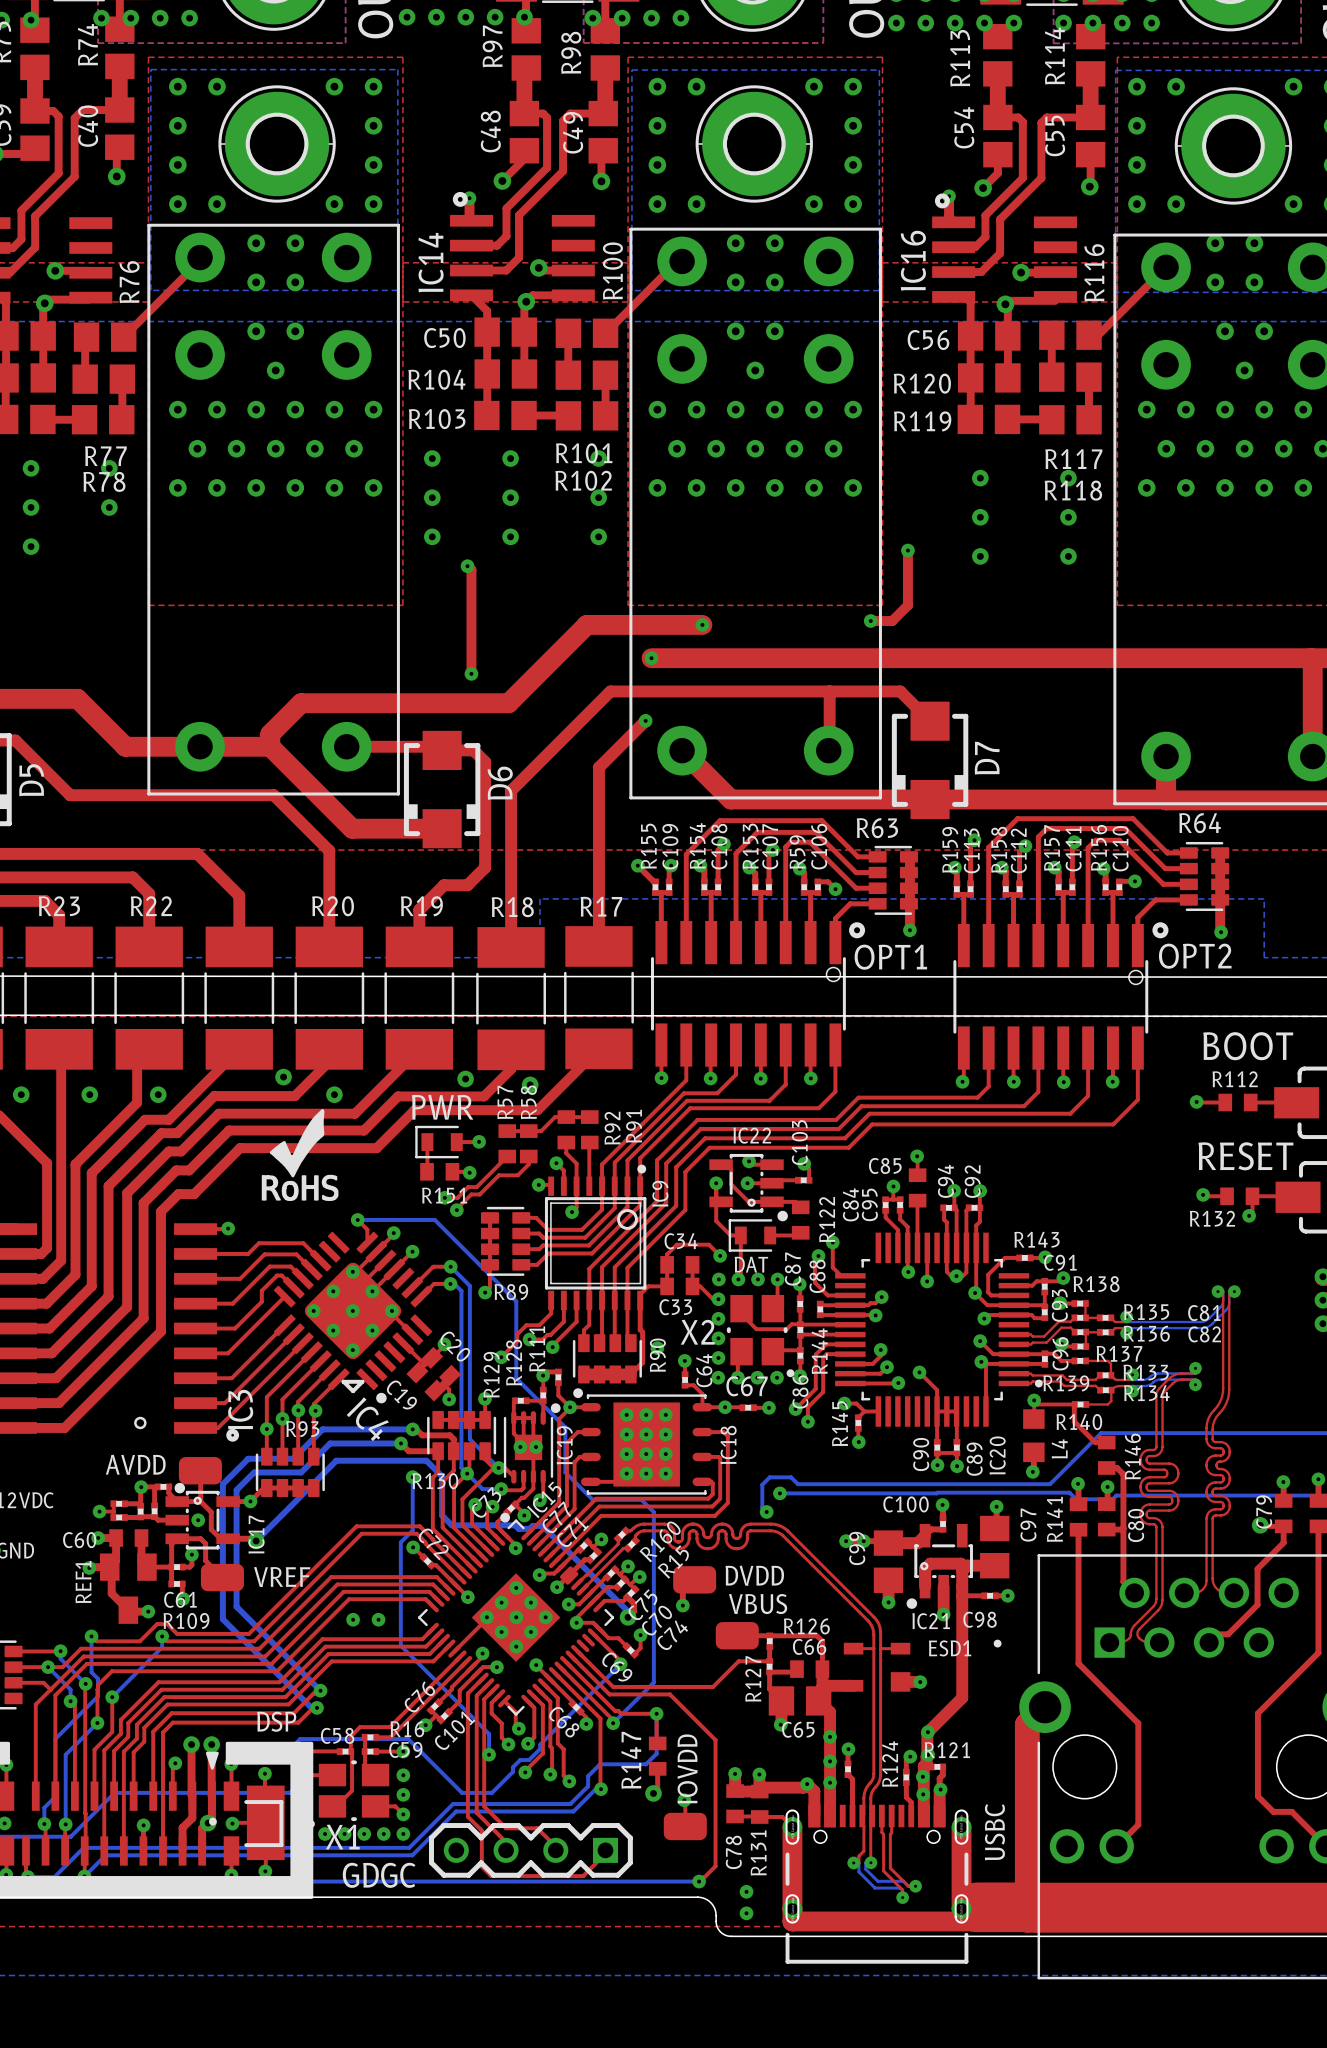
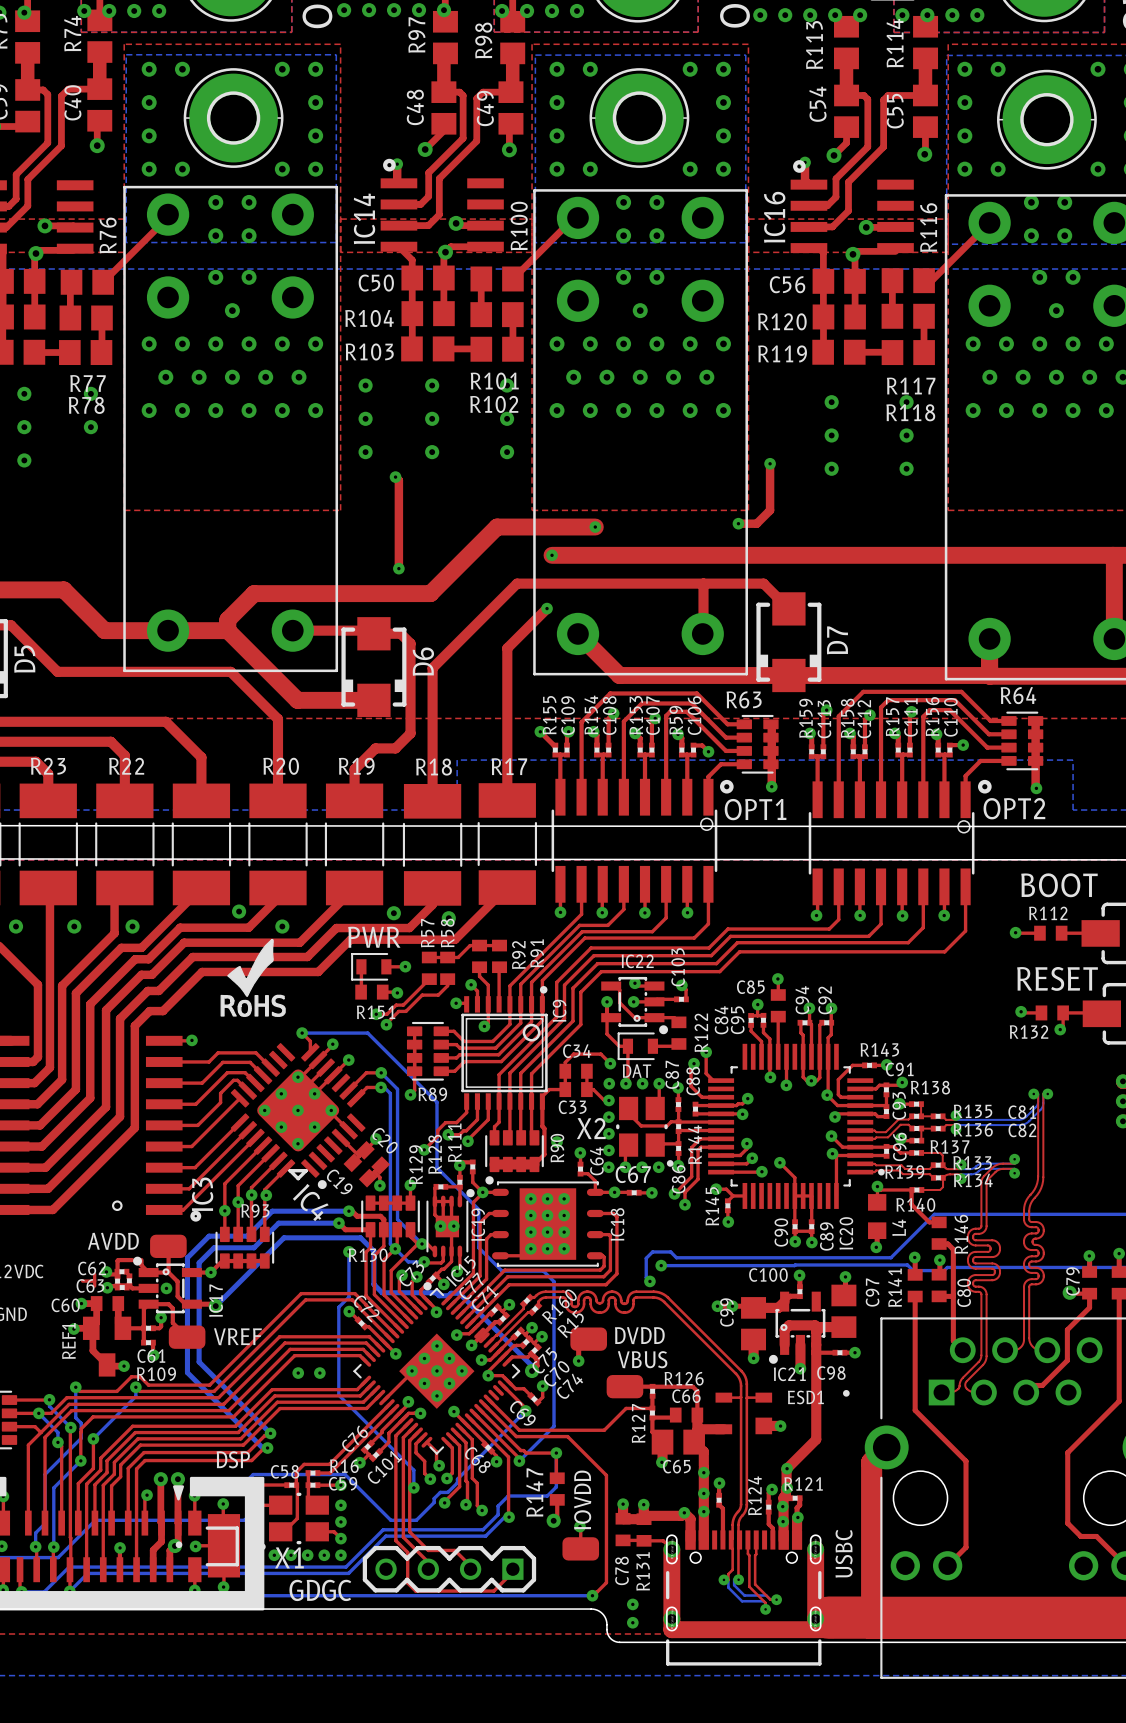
top track: (156, 1486) (154, 1488) (154, 1505) -> none
part: (163, 1486) -> none
via position: (141, 1487) -> (106, 1271)
drawing position: (179, 1488) -> (137, 1261)
C62: none -> (121, 1271)
part: (119, 1503) -> none
via: (99, 1511) -> none
part: (119, 1517) -> none
via: none -> (107, 1287)
C63: none -> (122, 1287)

